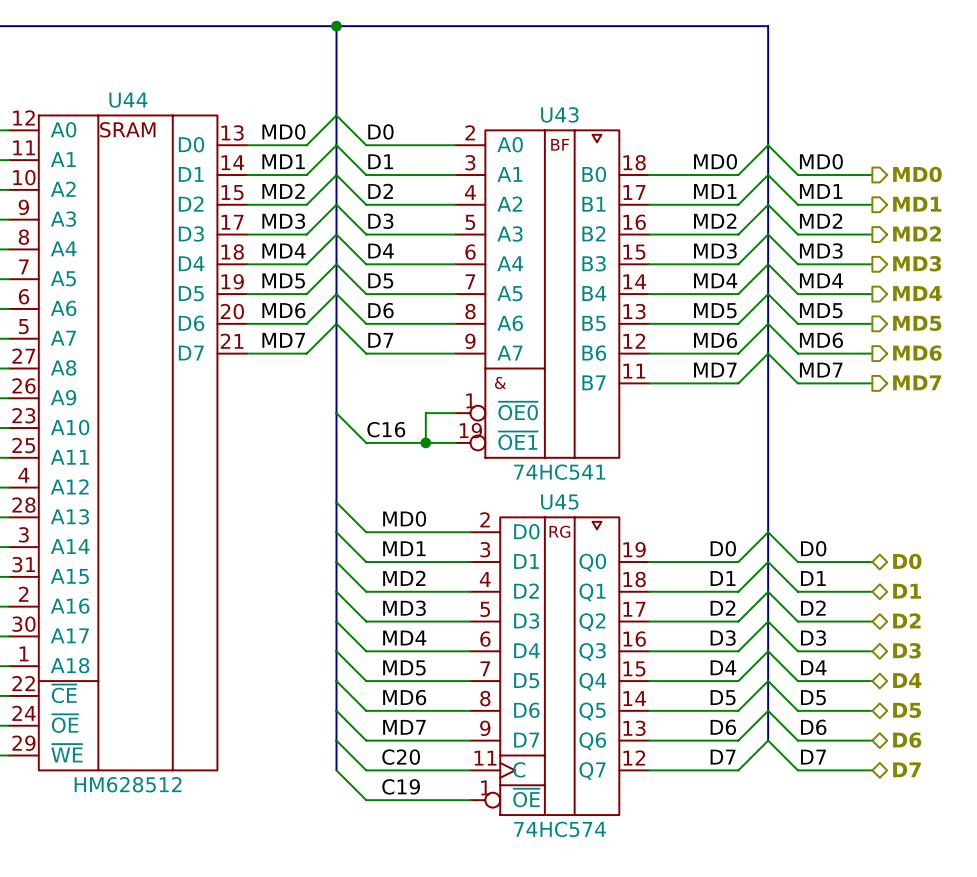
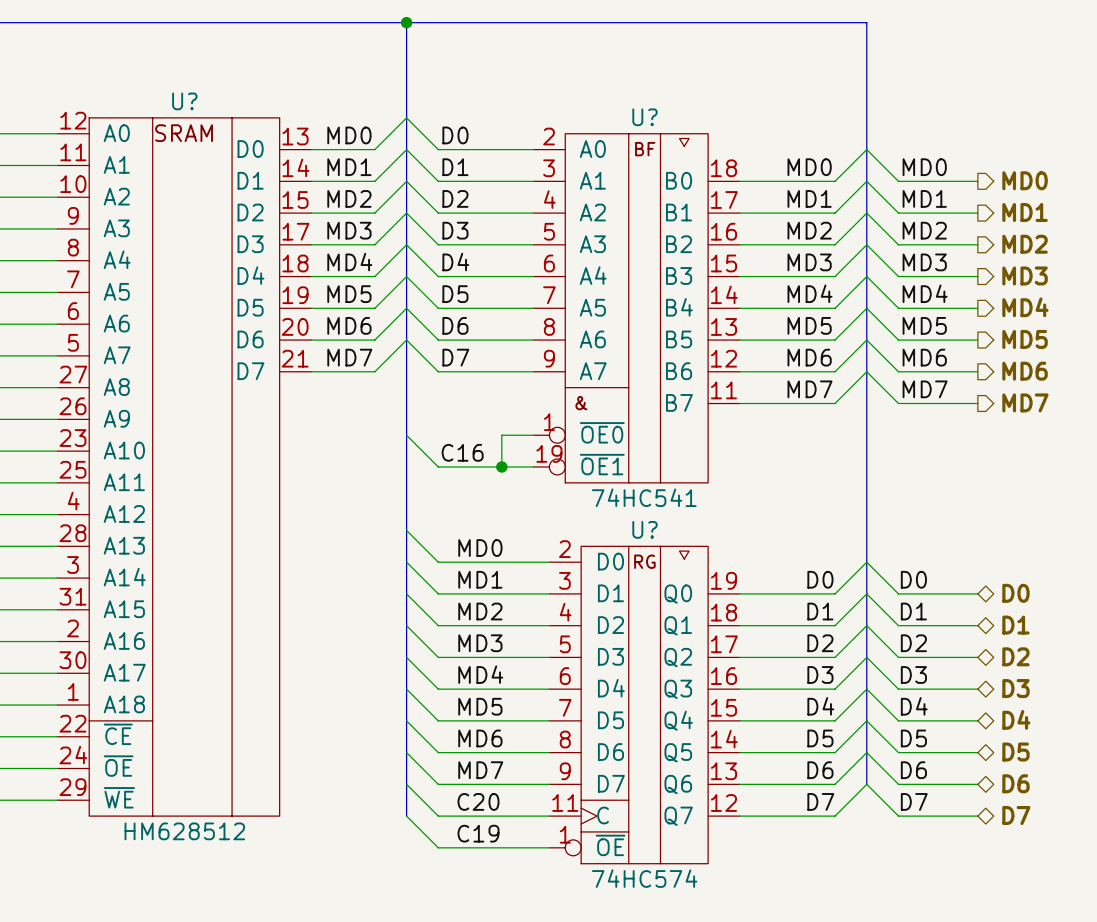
U44 name: U44 (128, 100) -> U? (184, 101)
U43 name: U43 (559, 114) -> U? (645, 117)
U45 name: U45 (559, 502) -> U? (645, 529)

